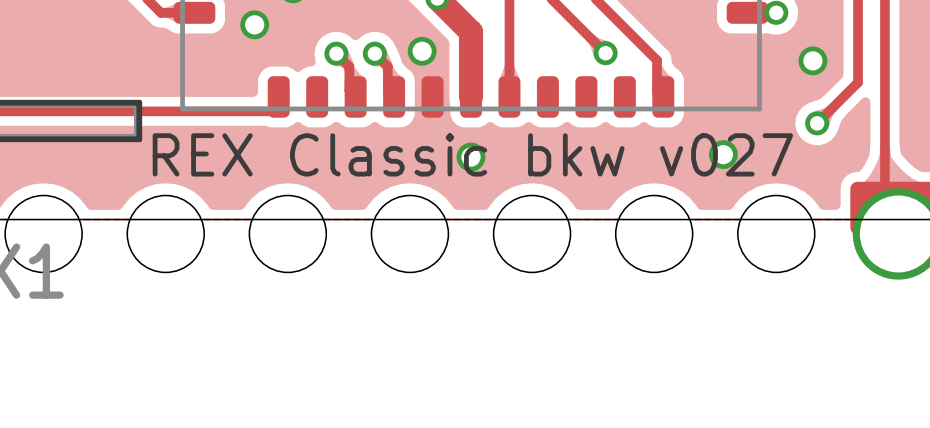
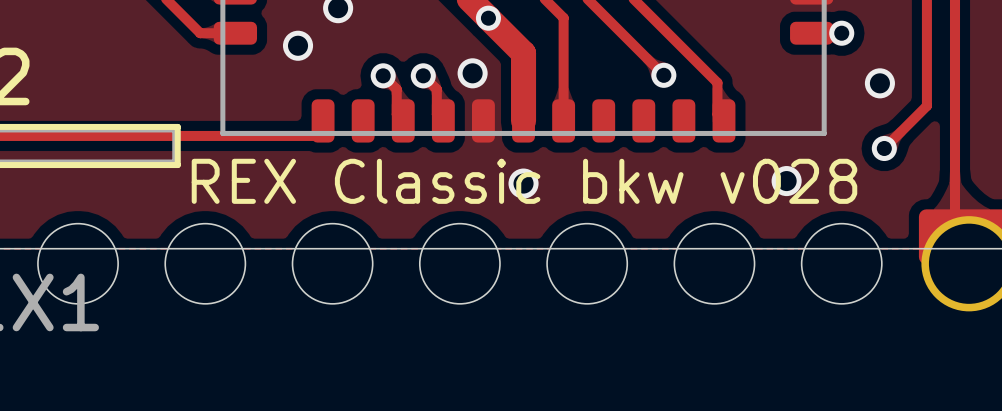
text: REX Classic bkw v027 (472, 154) -> REX Classic bkw v028 (524, 181)

